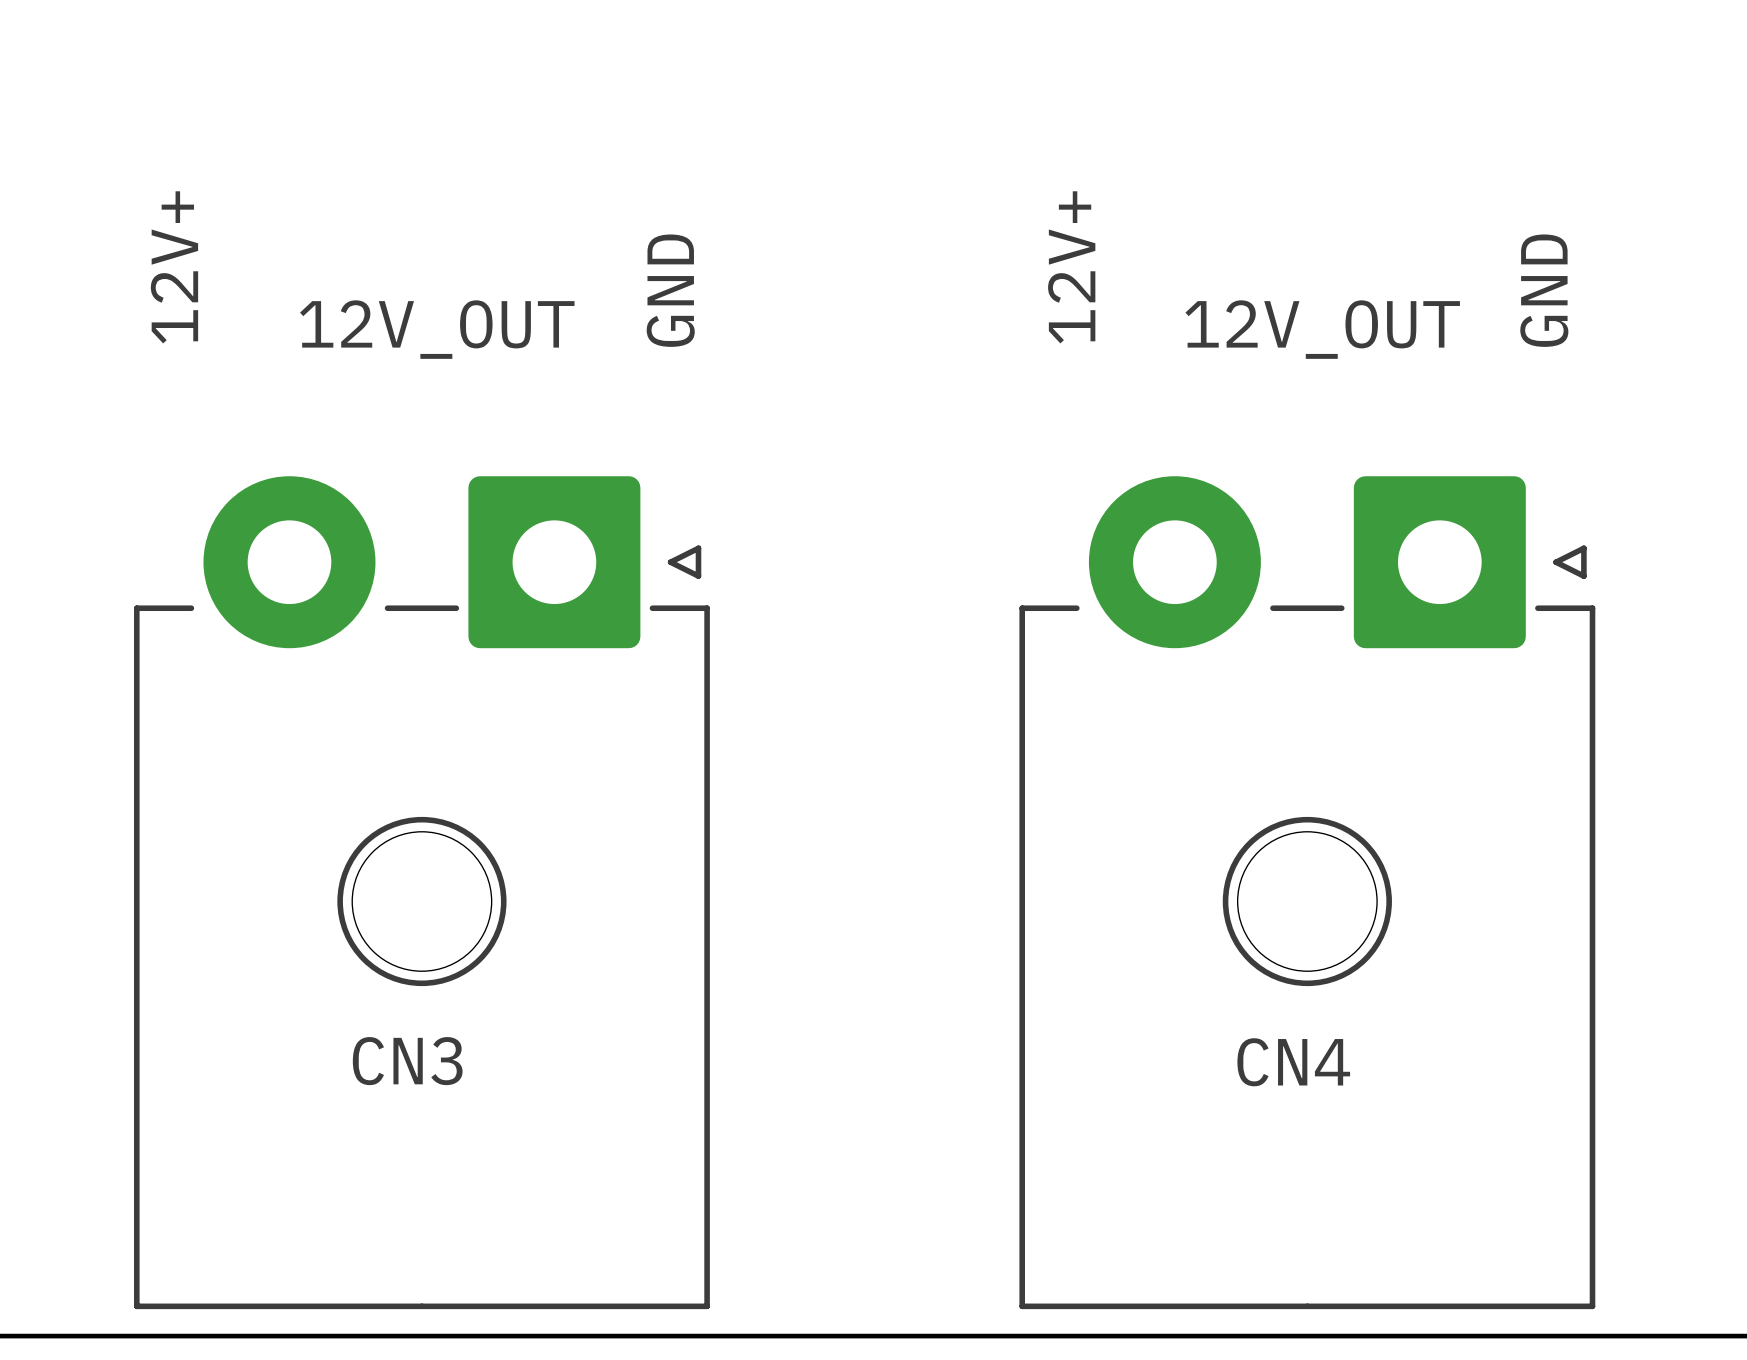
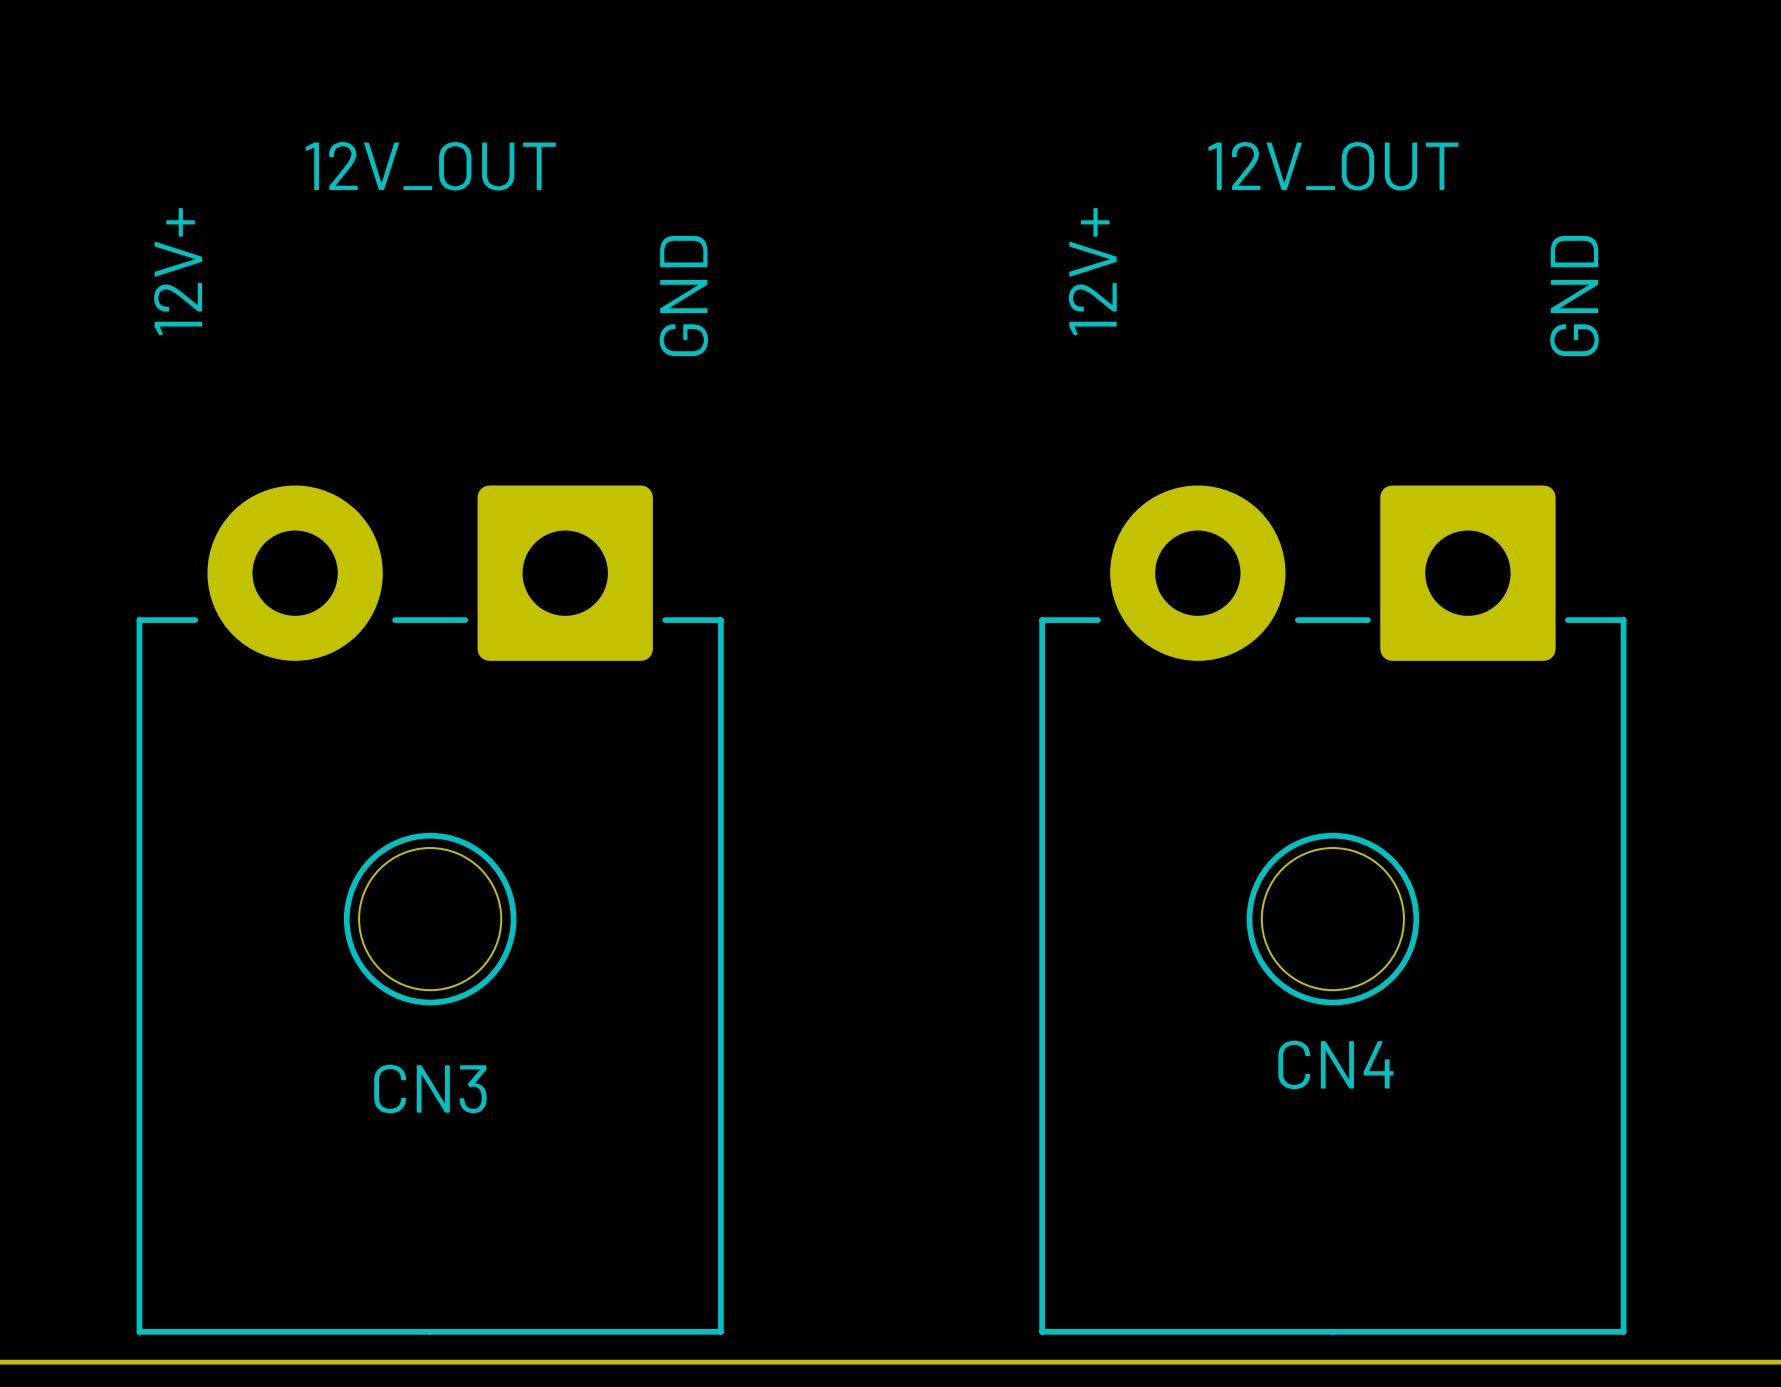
CN3 value position: 12V_OUT (437, 329) -> 12V_OUT (430, 166)
CN4 value position: 12V_OUT (1322, 329) -> 12V_OUT (1333, 166)
CN3 footprint: [134, 476, 710, 1310] -> [136, 485, 724, 1335]
CN4 footprint: [1019, 476, 1596, 1310] -> [1039, 485, 1627, 1335]

